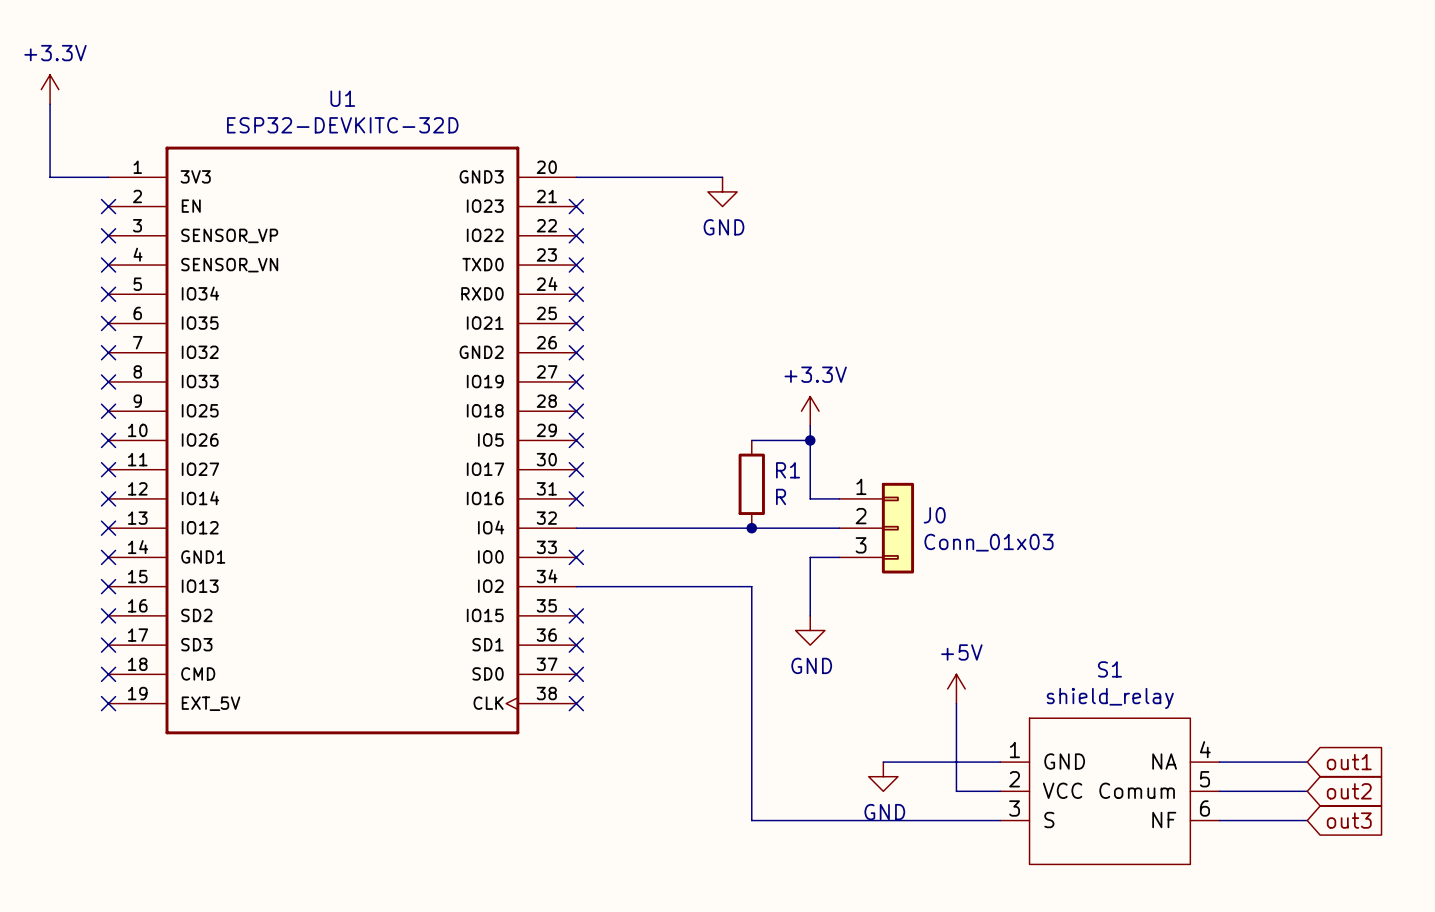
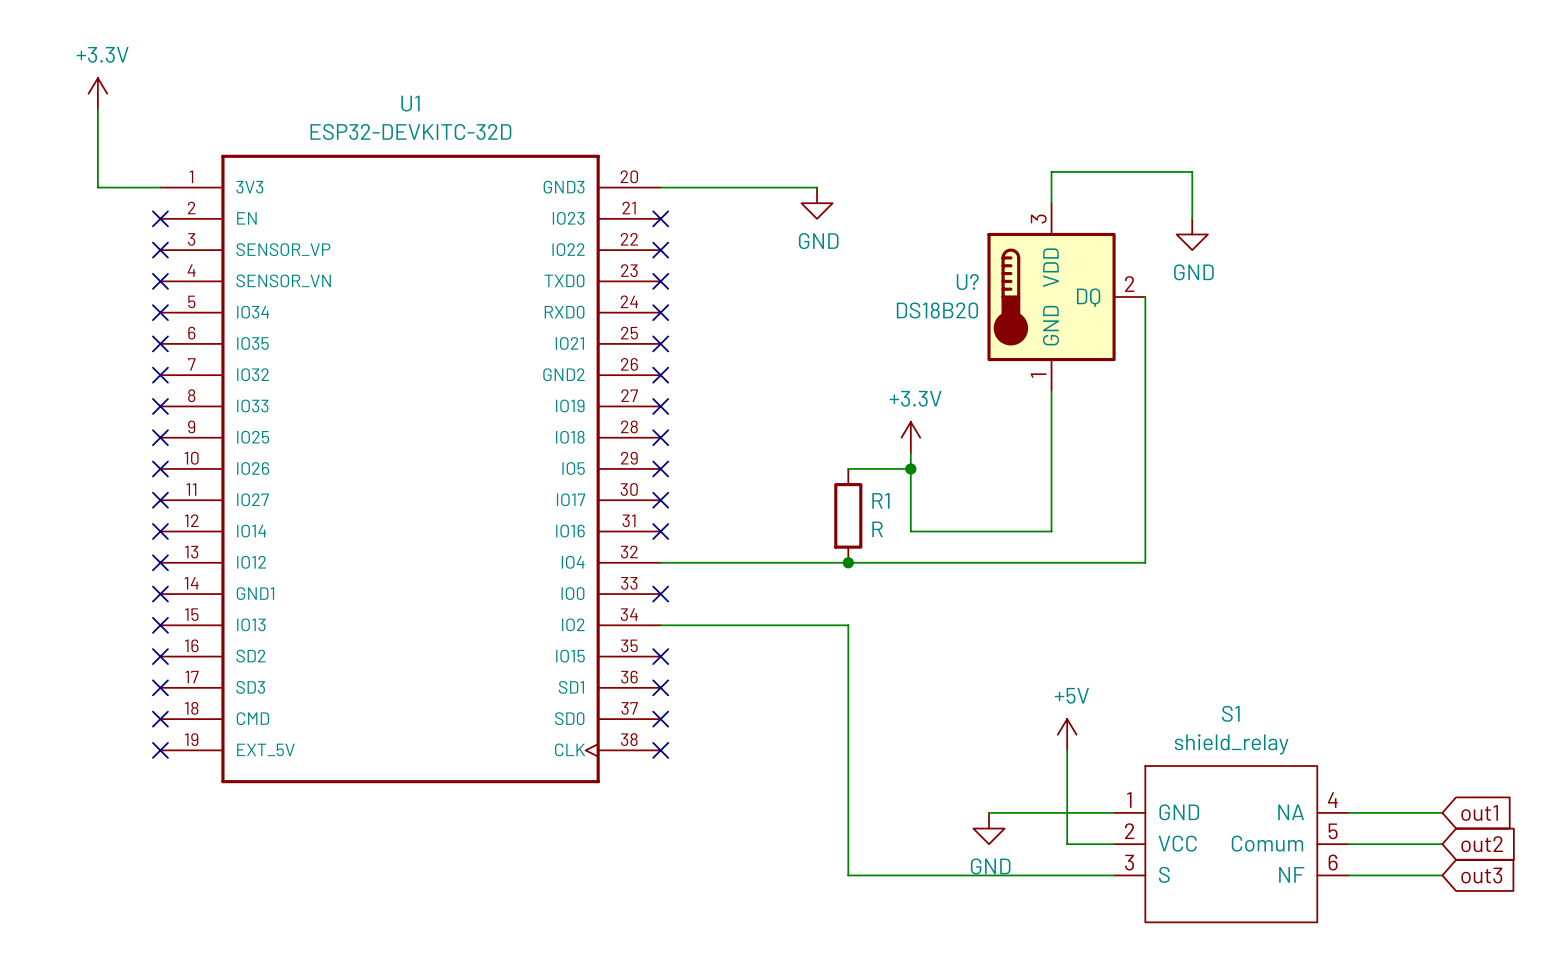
wire: none -> (1051, 203) (1051, 171) (1192, 171) (1192, 218)
power symbol: none -> GND (1192, 234)
U?: none -> DS18B20 (1066, 297)
wire: none -> (1145, 297) (1145, 562) (942, 562)
wire: none -> (1051, 390) (1051, 531) (942, 531)
J0: Conn_01x03 (876, 528) -> none
wire: (839, 557) (810, 557) (810, 615) -> none
power symbol: GND (810, 630) -> none

